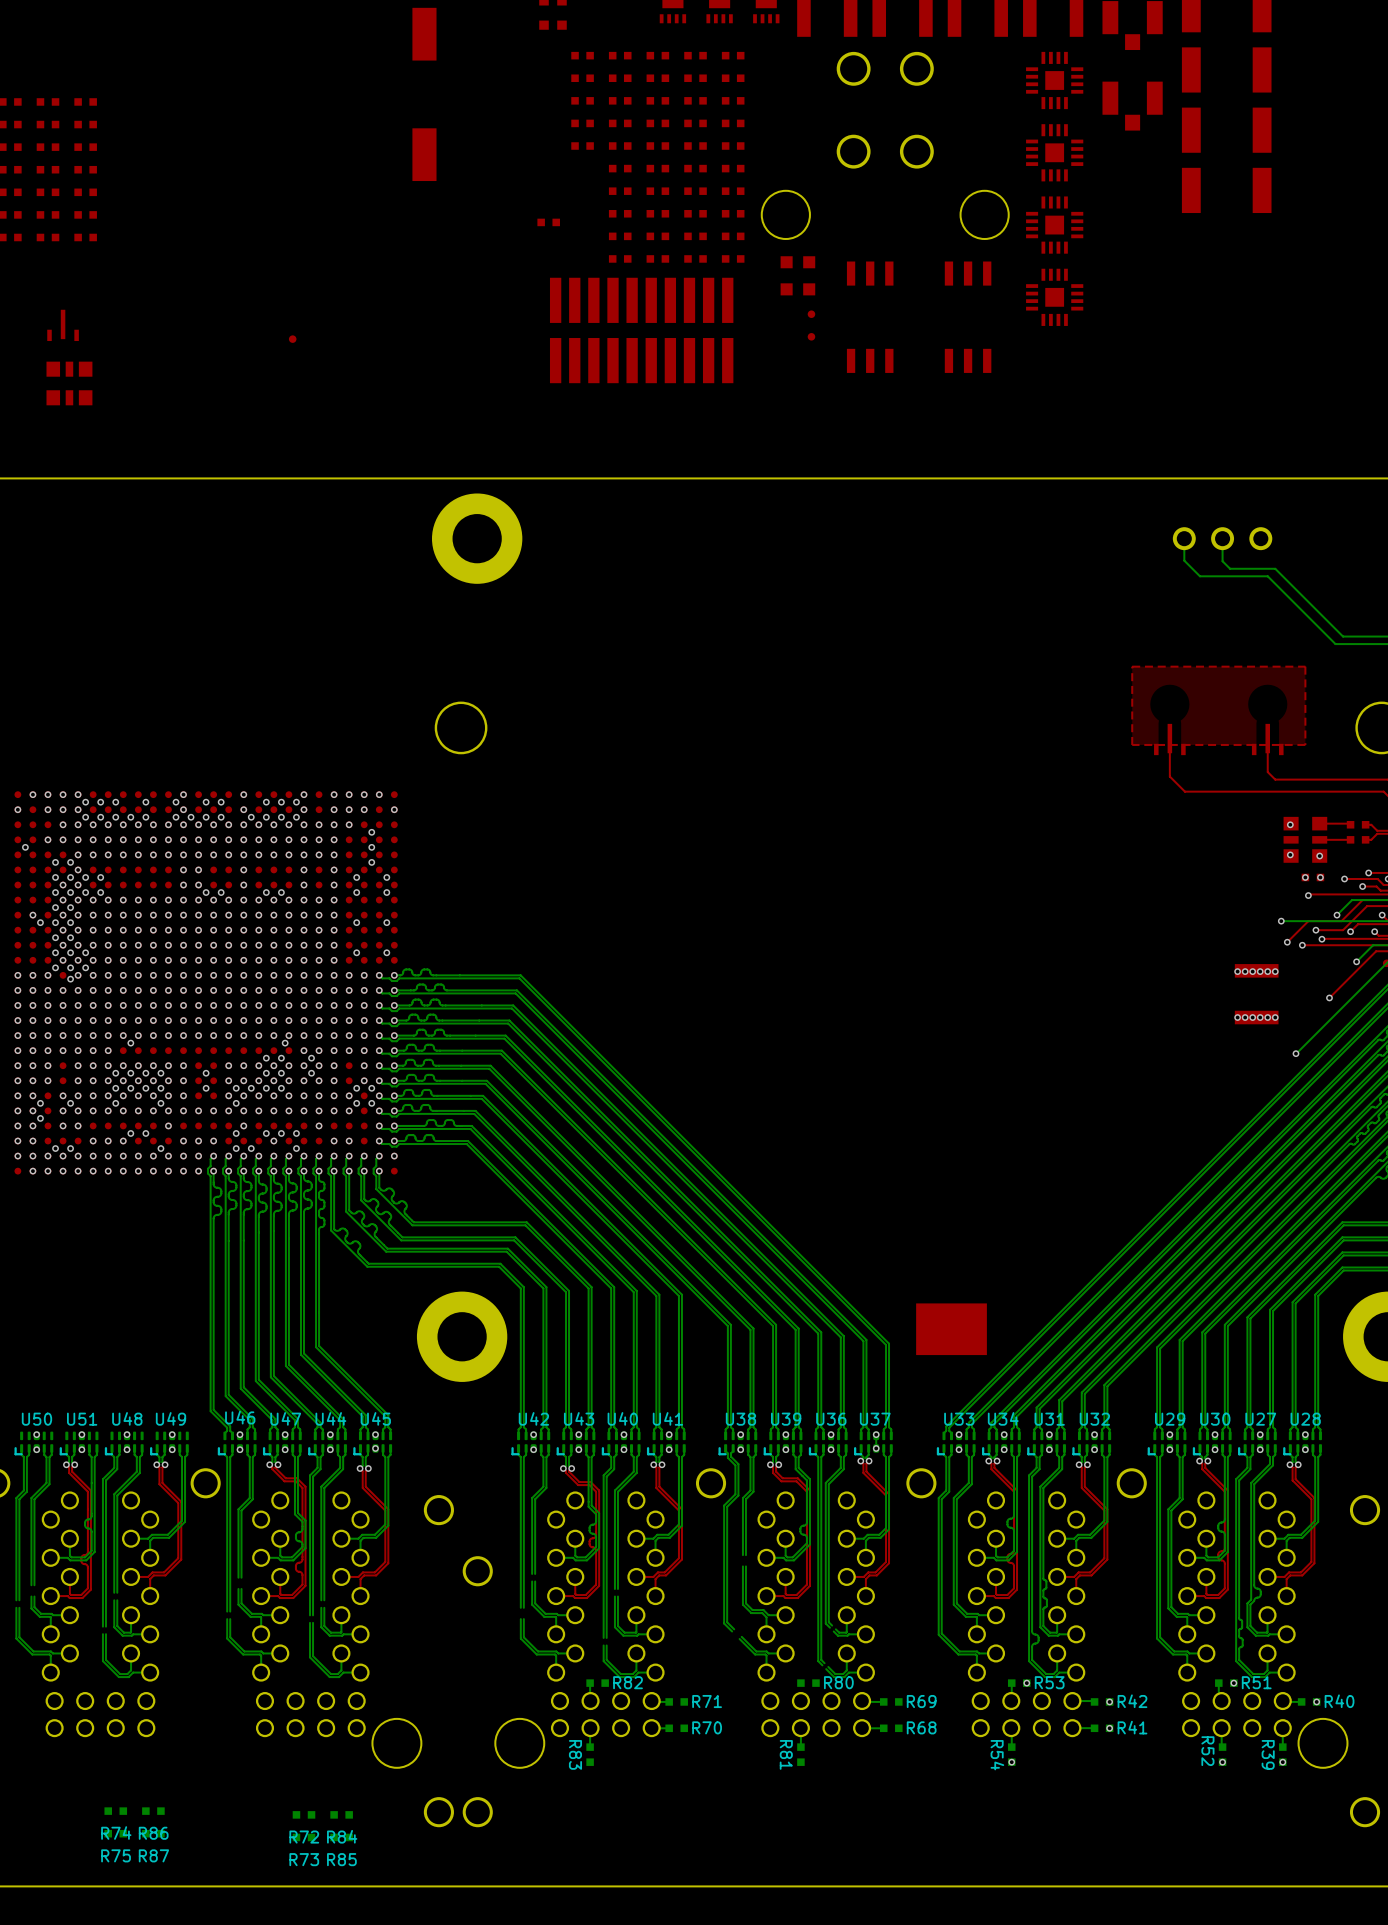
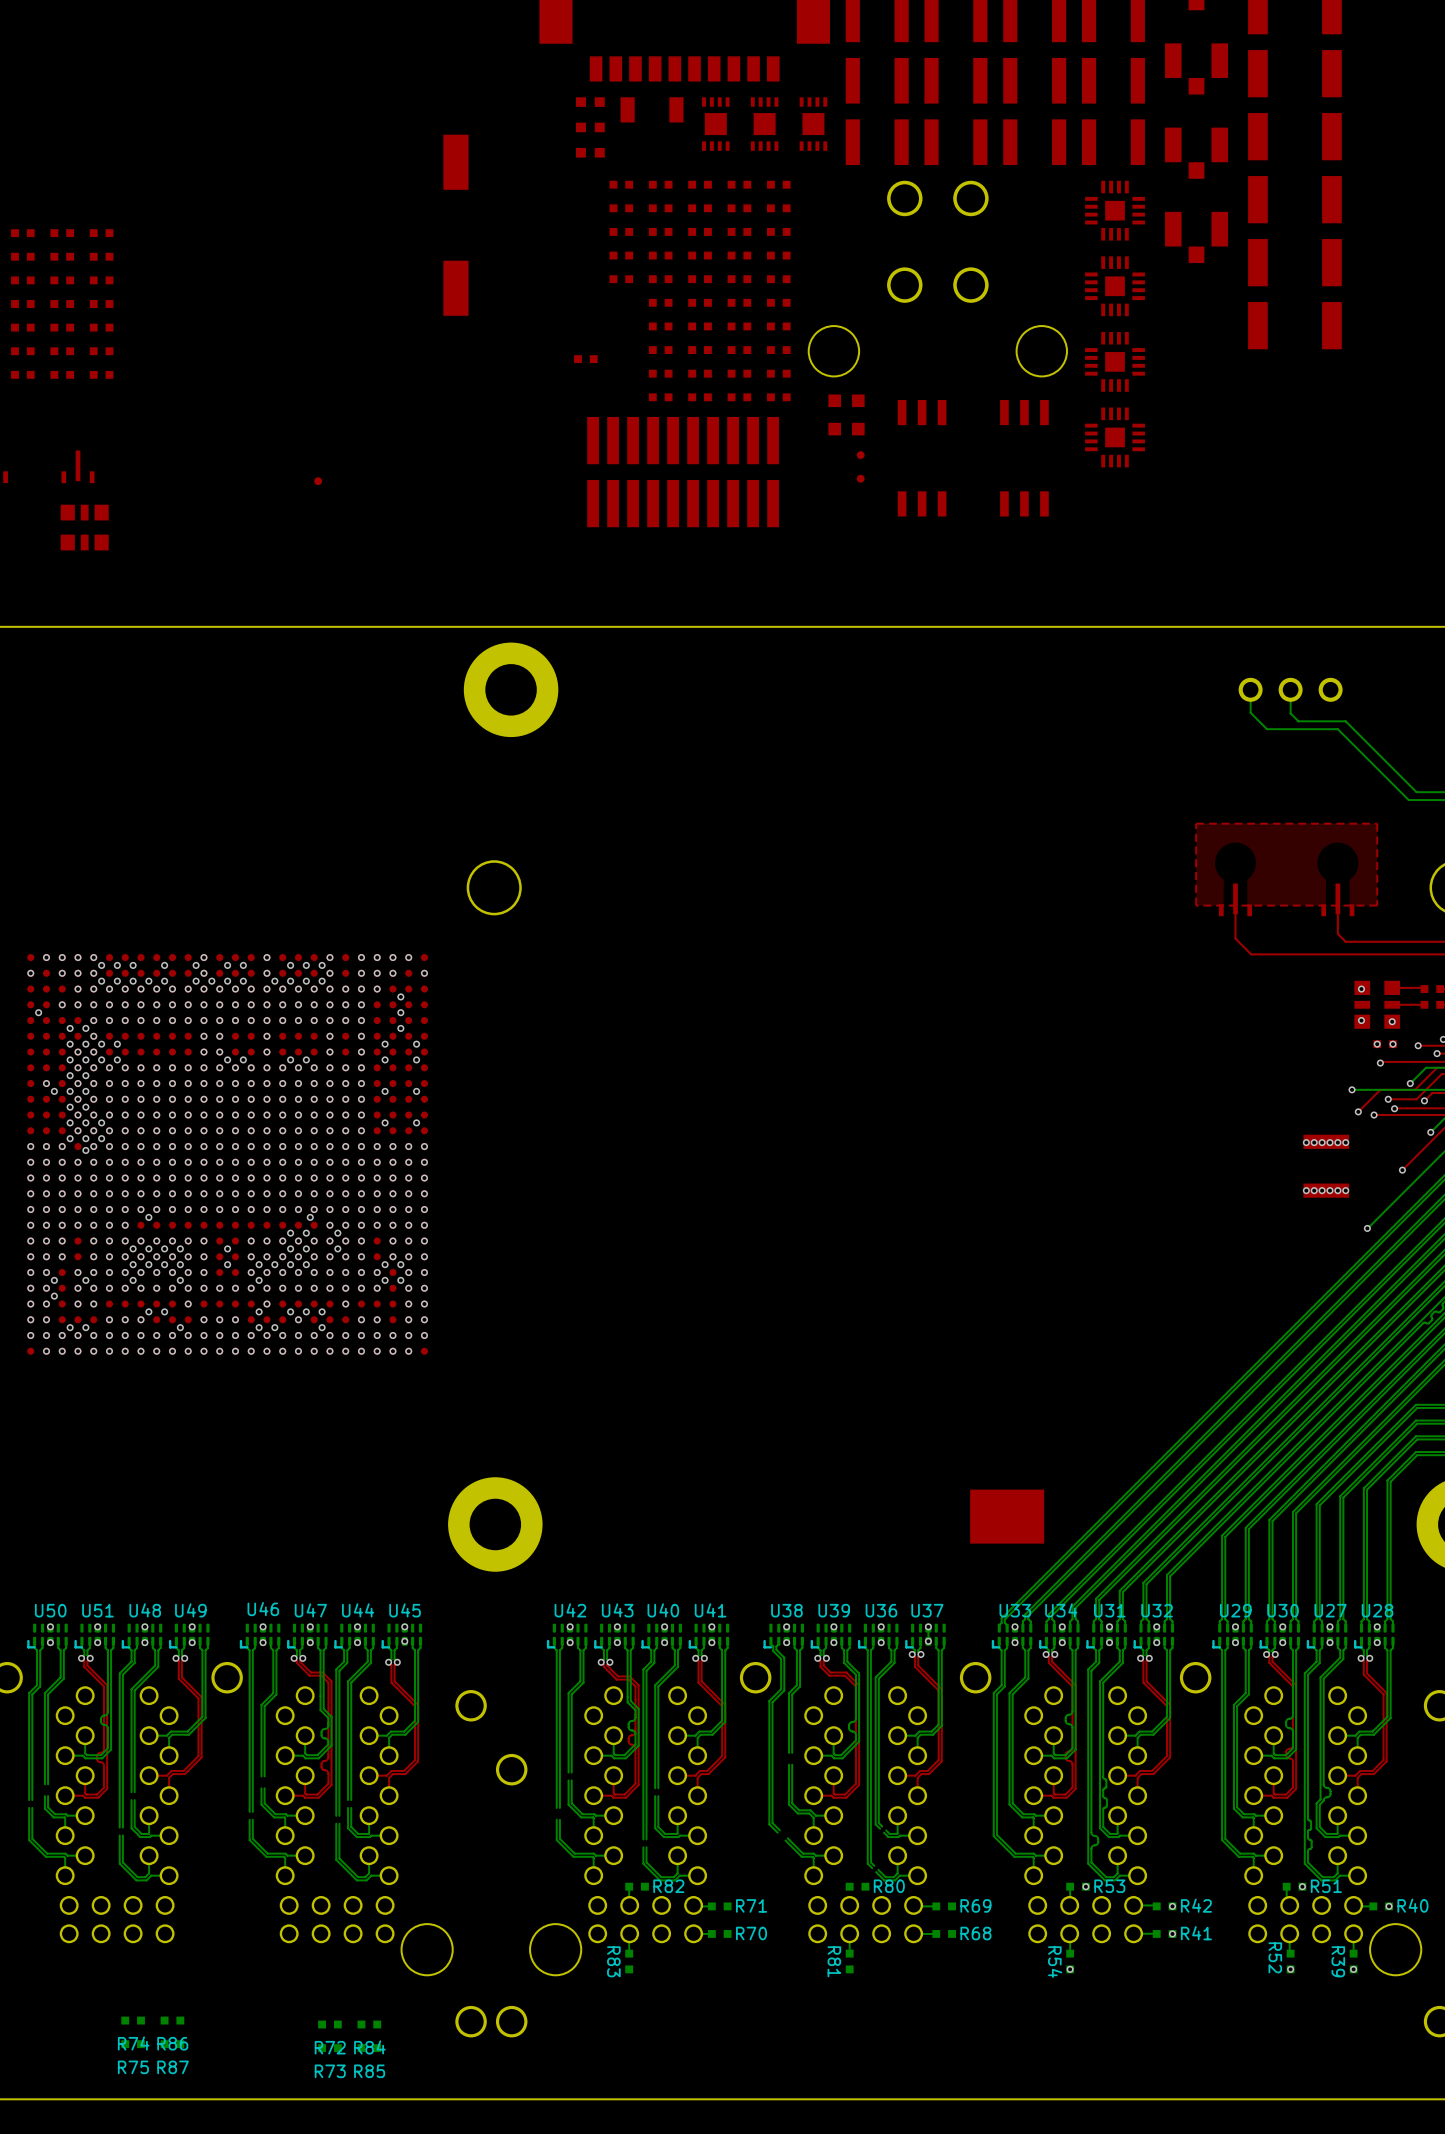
bottom track: (379, 975) (382, 978) (389, 978) (392, 981) (396, 981) (399, 978) (519, 978) (886, 1344) (886, 1427) (883, 1429) (883, 1435) -> none
bottom track: (394, 975) (401, 975) (406, 969) (410, 969) (415, 975) (419, 974) (424, 969) (428, 969) (432, 975) (520, 975) (889, 1343) (889, 1427) (891, 1429) (891, 1435) -> none
bottom track: (379, 990) (382, 993) (389, 993) (392, 996) (396, 996) (399, 993) (515, 993) (863, 1341) (863, 1427) (861, 1429) (861, 1435) -> none
bottom track: (394, 990) (414, 990) (419, 984) (424, 985) (427, 990) (432, 990) (437, 984) (442, 985) (446, 990) (516, 990) (866, 1339) (866, 1427) (868, 1429) (868, 1435) -> none
bottom track: (379, 1005) (382, 1008) (389, 1008) (392, 1011) (396, 1011) (399, 1008) (511, 1008) (840, 1337) (840, 1427) (838, 1429) (838, 1435) -> none
bottom track: (394, 1005) (410, 1005) (415, 999) (420, 999) (424, 1005) (429, 1005) (433, 999) (438, 1000) (442, 1005) (513, 1005) (843, 1336) (843, 1427) (846, 1429) (846, 1435) -> none
bottom track: (379, 1020) (382, 1023) (389, 1023) (392, 1026) (396, 1026) (399, 1023) (508, 1023) (818, 1333) (818, 1427) (815, 1429) (815, 1435) -> none
bottom track: (394, 1020) (407, 1020) (412, 1014) (417, 1015) (419, 1020) (424, 1020) (430, 1014) (434, 1015) (438, 1020) (509, 1020) (821, 1332) (821, 1427) (823, 1429) (823, 1435) -> none
bottom track: (379, 1035) (382, 1038) (389, 1038) (392, 1041) (396, 1041) (399, 1038) (504, 1038) (795, 1329) (795, 1427) (793, 1429) (793, 1435) -> none
bottom track: (394, 1035) (414, 1035) (419, 1029) (424, 1030) (428, 1035) (433, 1035) (436, 1030) (441, 1029) (446, 1035) (505, 1035) (798, 1328) (798, 1427) (800, 1429) (800, 1435) -> none
bottom track: (379, 1050) (382, 1053) (389, 1053) (392, 1056) (396, 1056) (399, 1053) (500, 1053) (773, 1326) (773, 1427) (770, 1429) (770, 1435) -> none
bottom track: (394, 1050) (404, 1050) (409, 1044) (414, 1045) (417, 1050) (422, 1050) (427, 1044) (432, 1045) (436, 1050) (501, 1050) (776, 1324) (776, 1427) (778, 1429) (778, 1435) -> none
bottom track: (379, 1065) (382, 1068) (389, 1068) (392, 1071) (396, 1071) (399, 1068) (489, 1068) (750, 1329) (750, 1427) (748, 1429) (748, 1435) -> none
bottom track: (394, 1065) (403, 1065) (408, 1059) (413, 1060) (416, 1065) (421, 1065) (426, 1059) (431, 1060) (435, 1065) (490, 1065) (753, 1328) (753, 1427) (755, 1429) (755, 1435) -> none
bottom track: (379, 1080) (382, 1083) (389, 1083) (392, 1086) (396, 1086) (399, 1083) (485, 1083) (727, 1326) (727, 1427) (725, 1429) (725, 1435) -> none
bottom track: (394, 1080) (404, 1080) (409, 1074) (414, 1075) (417, 1080) (422, 1080) (427, 1074) (432, 1075) (436, 1080) (486, 1080) (730, 1324) (730, 1427) (733, 1429) (733, 1435) -> none
bottom track: (379, 1095) (382, 1098) (389, 1098) (392, 1101) (396, 1101) (399, 1098) (481, 1098) (678, 1295) (678, 1427) (676, 1429) (676, 1435) -> none
bottom track: (394, 1095) (402, 1095) (407, 1089) (412, 1090) (414, 1095) (419, 1095) (425, 1089) (430, 1090) (433, 1095) (483, 1095) (681, 1294) (681, 1427) (684, 1429) (684, 1435) -> none
bottom track: (379, 1110) (382, 1113) (389, 1113) (392, 1116) (396, 1116) (399, 1113) (474, 1113) (656, 1295) (656, 1427) (654, 1429) (654, 1435) -> none
bottom track: (394, 1110) (401, 1110) (406, 1104) (410, 1105) (414, 1110) (419, 1110) (422, 1105) (427, 1104) (432, 1110) (475, 1110) (659, 1294) (659, 1427) (661, 1429) (661, 1435) -> none
bottom track: (379, 1125) (382, 1128) (389, 1128) (392, 1131) (396, 1131) (399, 1128) (470, 1128) (633, 1292) (633, 1427) (631, 1429) (631, 1435) -> none
bottom track: (394, 1125) (424, 1125) (429, 1120) (434, 1120) (438, 1125) (443, 1125) (446, 1120) (450, 1120) (456, 1125) (471, 1125) (636, 1290) (636, 1427) (639, 1429) (639, 1435) -> none
bottom track: (379, 1141) (382, 1144) (389, 1144) (392, 1146) (396, 1146) (399, 1144) (466, 1144) (611, 1288) (611, 1427) (608, 1429) (608, 1435) -> none
bottom track: (394, 1141) (404, 1140) (409, 1135) (414, 1135) (418, 1140) (422, 1140) (425, 1135) (430, 1135) (436, 1140) (468, 1141) (614, 1287) (614, 1427) (616, 1429) (616, 1435) -> none
bottom track: (213, 1156) (210, 1159) (210, 1166) (207, 1168) (207, 1173) (210, 1176) (210, 1411) (227, 1427) (224, 1435) -> none
bottom track: (228, 1156) (225, 1159) (225, 1166) (223, 1168) (223, 1173) (225, 1176) (225, 1396) (249, 1420) (247, 1435) -> none
bottom track: (243, 1156) (240, 1159) (240, 1166) (238, 1168) (238, 1173) (240, 1176) (240, 1388) (272, 1420) (270, 1435) -> none
bottom track: (258, 1156) (255, 1159) (255, 1166) (253, 1168) (253, 1173) (255, 1176) (255, 1381) (294, 1420) (292, 1435) -> none
bottom track: (273, 1156) (270, 1159) (270, 1166) (268, 1168) (268, 1173) (270, 1176) (270, 1377) (317, 1423) (315, 1435) -> none
bottom track: (288, 1156) (285, 1159) (285, 1166) (283, 1168) (283, 1173) (285, 1176) (285, 1366) (340, 1420) (337, 1435) -> none
bottom track: (303, 1156) (300, 1159) (300, 1166) (298, 1168) (298, 1173) (300, 1176) (300, 1354) (362, 1416) (360, 1435) -> none
bottom track: (319, 1156) (316, 1159) (316, 1166) (313, 1168) (313, 1173) (316, 1176) (316, 1347) (385, 1416) (383, 1435) -> none
bottom track: (334, 1156) (331, 1159) (331, 1166) (328, 1168) (328, 1173) (331, 1176) (331, 1230) (367, 1266) (499, 1266) (520, 1288) (520, 1427) (518, 1429) (518, 1435) -> none
bottom track: (349, 1156) (346, 1159) (346, 1166) (343, 1168) (343, 1173) (346, 1176) (346, 1211) (386, 1251) (506, 1251) (543, 1288) (543, 1427) (541, 1429) (541, 1435) -> none
bottom track: (364, 1156) (361, 1159) (361, 1166) (358, 1168) (358, 1173) (361, 1176) (361, 1200) (401, 1240) (514, 1240) (566, 1292) (566, 1427) (563, 1429) (563, 1435) -> none
bottom track: (379, 1156) (376, 1159) (376, 1166) (373, 1168) (373, 1173) (376, 1176) (376, 1189) (412, 1225) (525, 1225) (588, 1288) (588, 1427) (586, 1429) (586, 1435) -> none
bottom track: (213, 1171) (213, 1185) (221, 1191) (220, 1195) (214, 1198) (213, 1203) (221, 1209) (220, 1213) (215, 1215) (213, 1218) (213, 1409) (230, 1426) (232, 1435) -> none
bottom track: (228, 1171) (229, 1179) (236, 1185) (235, 1189) (229, 1192) (228, 1197) (236, 1203) (235, 1207) (230, 1209) (228, 1212) (228, 1394) (252, 1418) (255, 1435) -> none
bottom track: (243, 1171) (244, 1180) (251, 1185) (250, 1190) (244, 1192) (243, 1197) (251, 1203) (250, 1207) (245, 1209) (243, 1212) (243, 1387) (275, 1418) (277, 1435) -> none
bottom track: (258, 1171) (259, 1182) (266, 1188) (265, 1192) (259, 1195) (258, 1199) (266, 1206) (265, 1210) (260, 1212) (258, 1215) (258, 1379) (297, 1418) (300, 1435) -> none
bottom track: (273, 1171) (274, 1181) (281, 1187) (280, 1191) (274, 1194) (273, 1198) (281, 1205) (280, 1209) (275, 1211) (273, 1214) (273, 1376) (320, 1422) (322, 1435) -> none
bottom track: (288, 1171) (289, 1181) (296, 1186) (295, 1191) (290, 1193) (288, 1196) (289, 1200) (295, 1202) (296, 1205) (295, 1209) (290, 1211) (288, 1214) (288, 1364) (343, 1418) (345, 1435) -> none
bottom track: (303, 1171) (304, 1179) (311, 1185) (310, 1189) (305, 1191) (303, 1194) (304, 1198) (310, 1200) (311, 1203) (310, 1207) (305, 1209) (303, 1212) (303, 1353) (365, 1415) (367, 1435) -> none
bottom track: (319, 1171) (319, 1179) (324, 1184) (324, 1189) (319, 1192) (319, 1197) (324, 1202) (324, 1207) (319, 1211) (319, 1216) (324, 1220) (324, 1225) (319, 1229) (319, 1345) (388, 1415) (390, 1435) -> none
bottom track: (334, 1171) (334, 1229) (337, 1230) (343, 1228) (346, 1230) (345, 1240) (349, 1243) (355, 1241) (359, 1243) (358, 1252) (368, 1263) (500, 1263) (523, 1287) (523, 1427) (526, 1429) (526, 1435) -> none
bottom track: (349, 1171) (349, 1210) (353, 1213) (359, 1211) (361, 1212) (364, 1216) (361, 1222) (364, 1225) (372, 1224) (376, 1226) (375, 1236) (387, 1248) (507, 1248) (546, 1287) (546, 1427) (548, 1429) (548, 1435) -> none
bottom track: (364, 1171) (364, 1199) (367, 1201) (373, 1199) (377, 1201) (376, 1211) (380, 1214) (386, 1211) (390, 1214) (389, 1223) (402, 1237) (515, 1237) (569, 1290) (569, 1427) (571, 1429) (571, 1435) -> none
bottom track: (379, 1171) (379, 1187) (383, 1190) (388, 1188) (391, 1189) (394, 1193) (391, 1199) (394, 1203) (402, 1201) (405, 1203) (404, 1212) (413, 1222) (526, 1222) (591, 1287) (591, 1427) (593, 1429) (593, 1435) -> none

